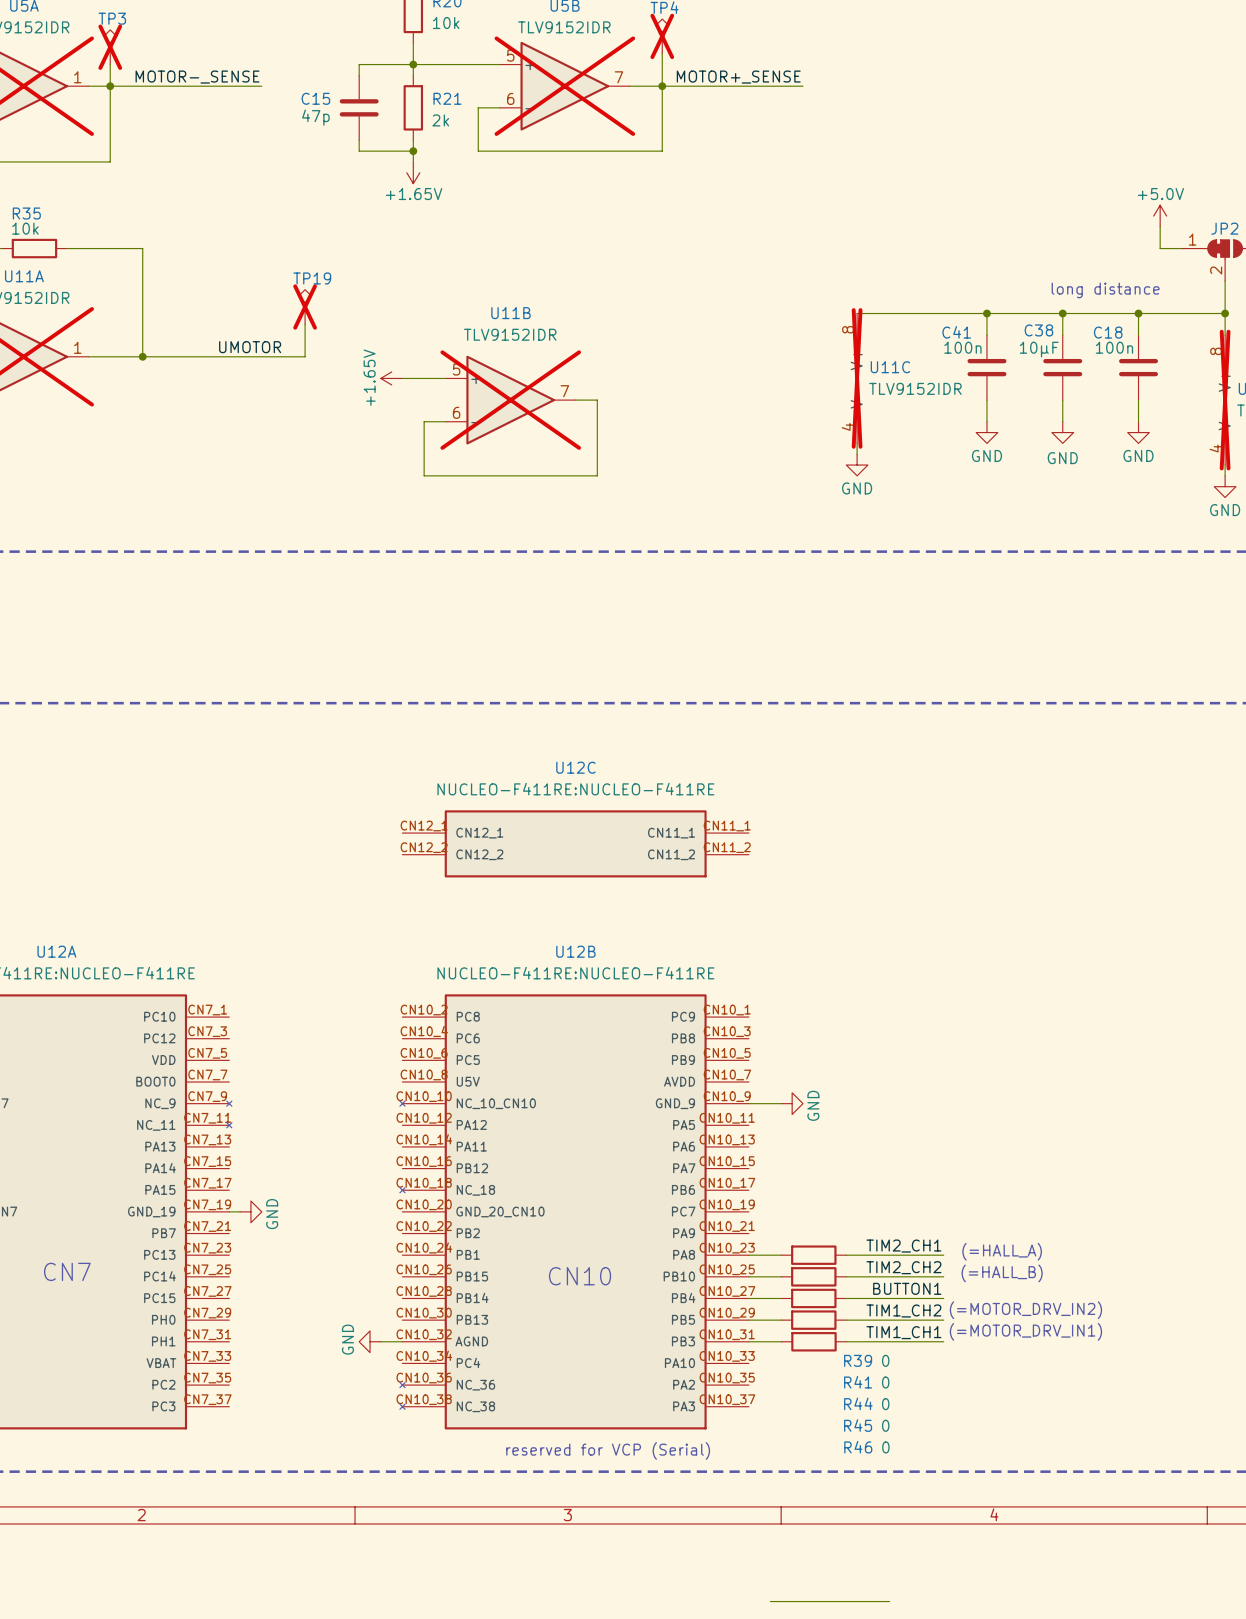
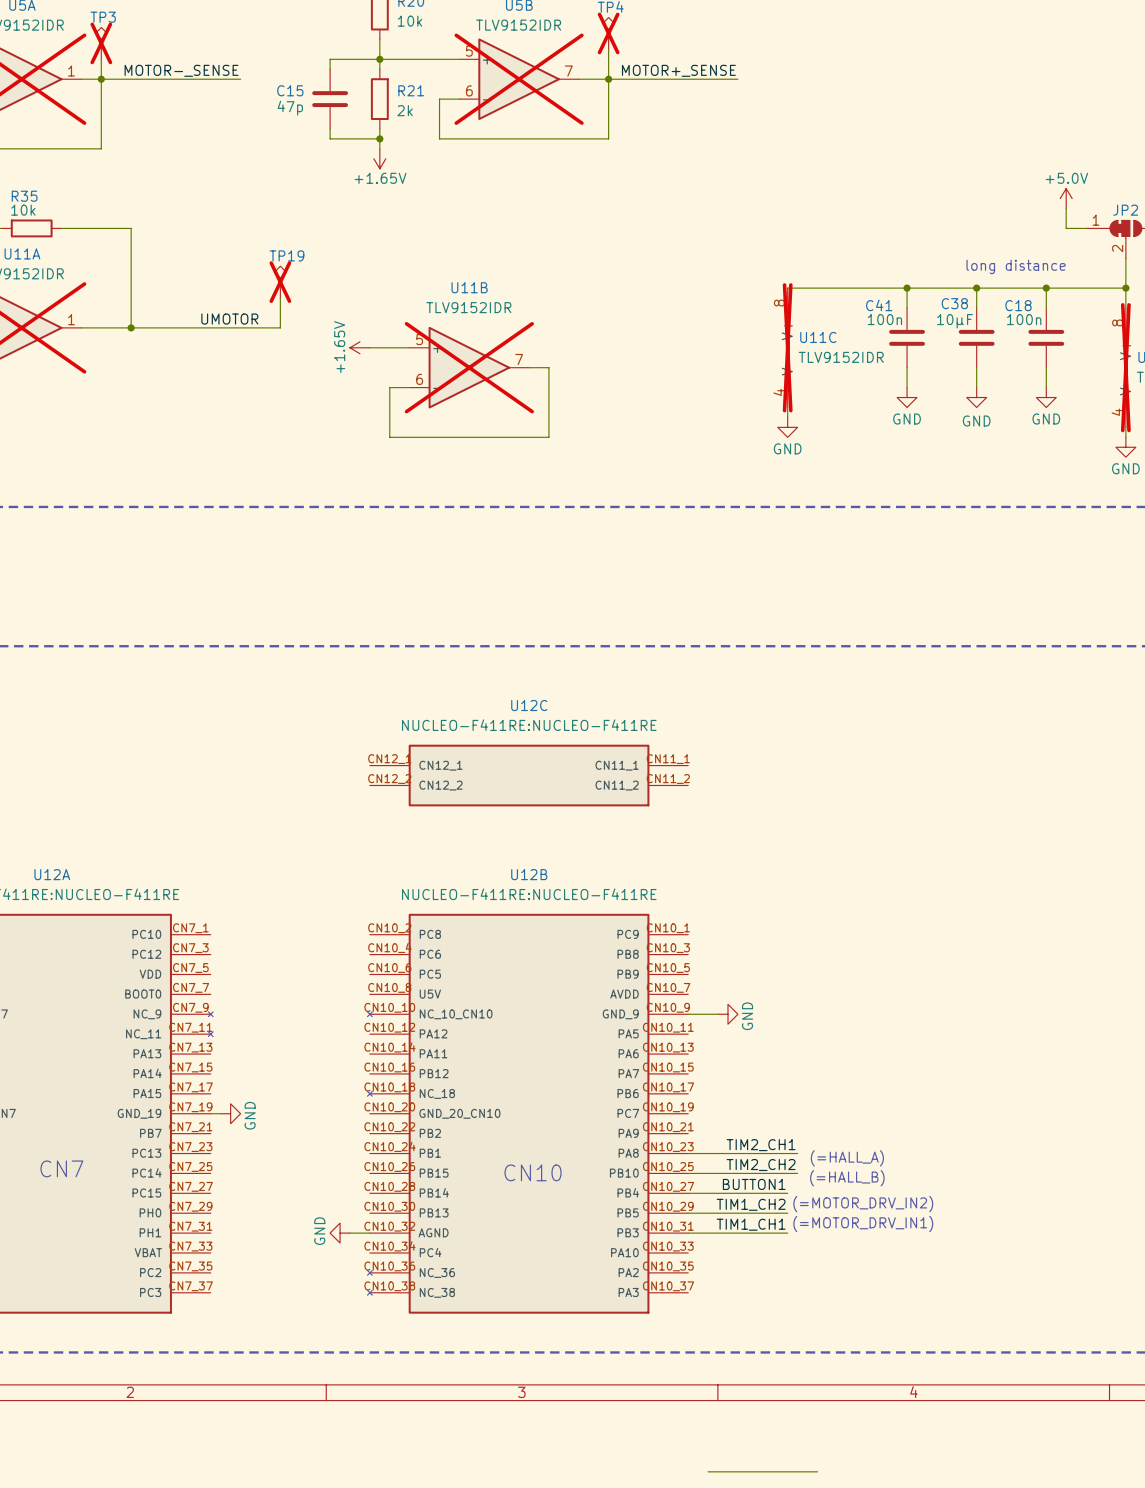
label position: TIM2_CH1 (903, 1246) -> TIM2_CH1 (761, 1145)
text position: (=HALL_A) (1002, 1251) -> (=HALL_A) (847, 1158)
wire: none -> (718, 1153) (777, 1153)
R39: 0 (813, 1255) -> none
wire: (867, 1255) (943, 1255) -> none
label position: TIM2_CH2 (903, 1267) -> TIM2_CH2 (761, 1165)
text position: (=HALL_B) (1002, 1273) -> (=HALL_B) (847, 1178)
wire: none -> (718, 1173) (777, 1173)
R41: 0 (813, 1276) -> none
wire: (867, 1276) (943, 1276) -> none
label position: BUTTON1 (907, 1288) -> BUTTON1 (754, 1184)
wire: none -> (718, 1193) (777, 1193)
R44: 0 (813, 1298) -> none
wire: (857, 1298) (943, 1298) -> none
label position: TIM1_CH2 (903, 1310) -> TIM1_CH2 (751, 1204)
text position: (=MOTOR_DRV_IN2) (1025, 1310) -> (=MOTOR_DRV_IN2) (863, 1204)
wire: none -> (718, 1213) (777, 1213)
R45: 0 (813, 1320) -> none
wire: (857, 1320) (943, 1320) -> none
text position: (=MOTOR_DRV_IN1) (1025, 1331) -> (=MOTOR_DRV_IN1) (863, 1224)
label position: TIM1_CH1 (903, 1332) -> TIM1_CH1 (751, 1224)
wire: none -> (718, 1233) (777, 1233)
R46: 0 (813, 1341) -> none
wire: (857, 1341) (943, 1341) -> none
text: reserved for VCP (Serial) (608, 1450) -> none

